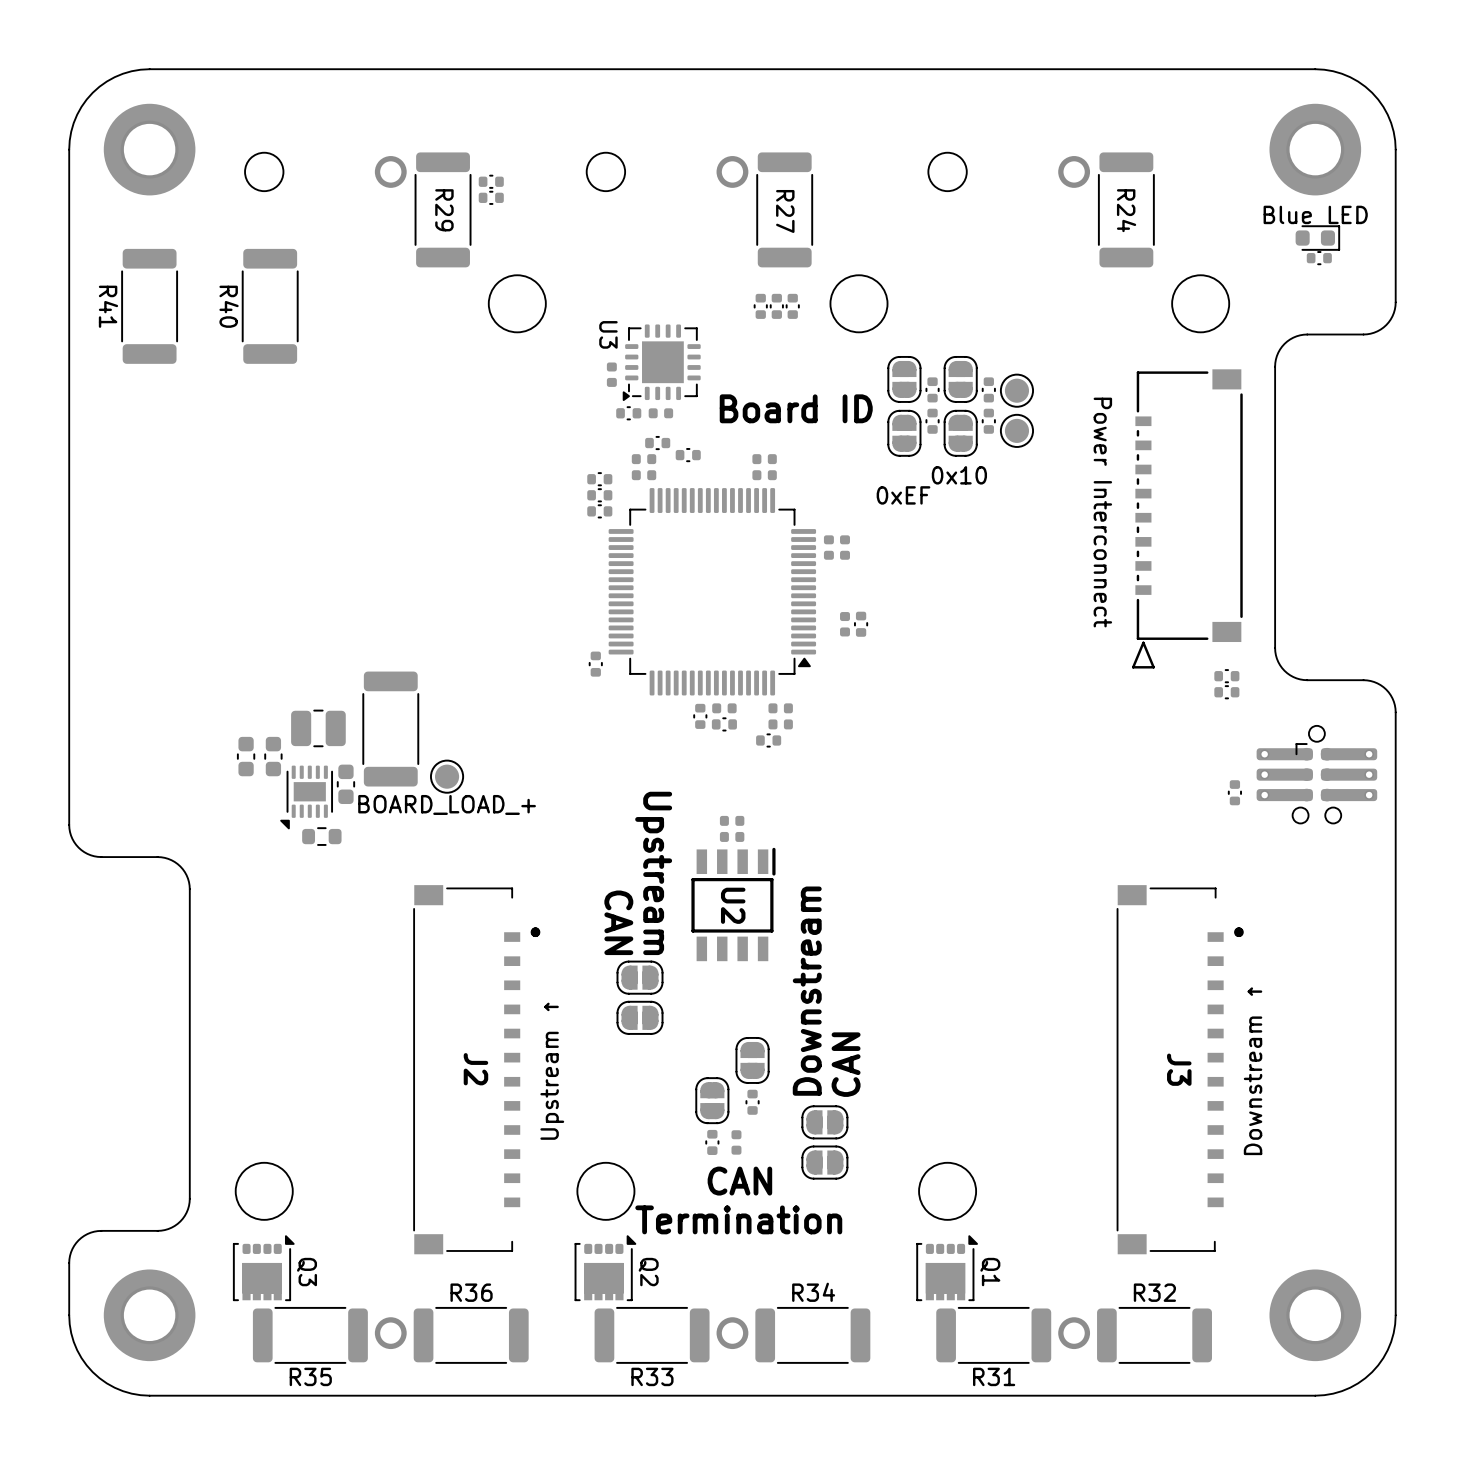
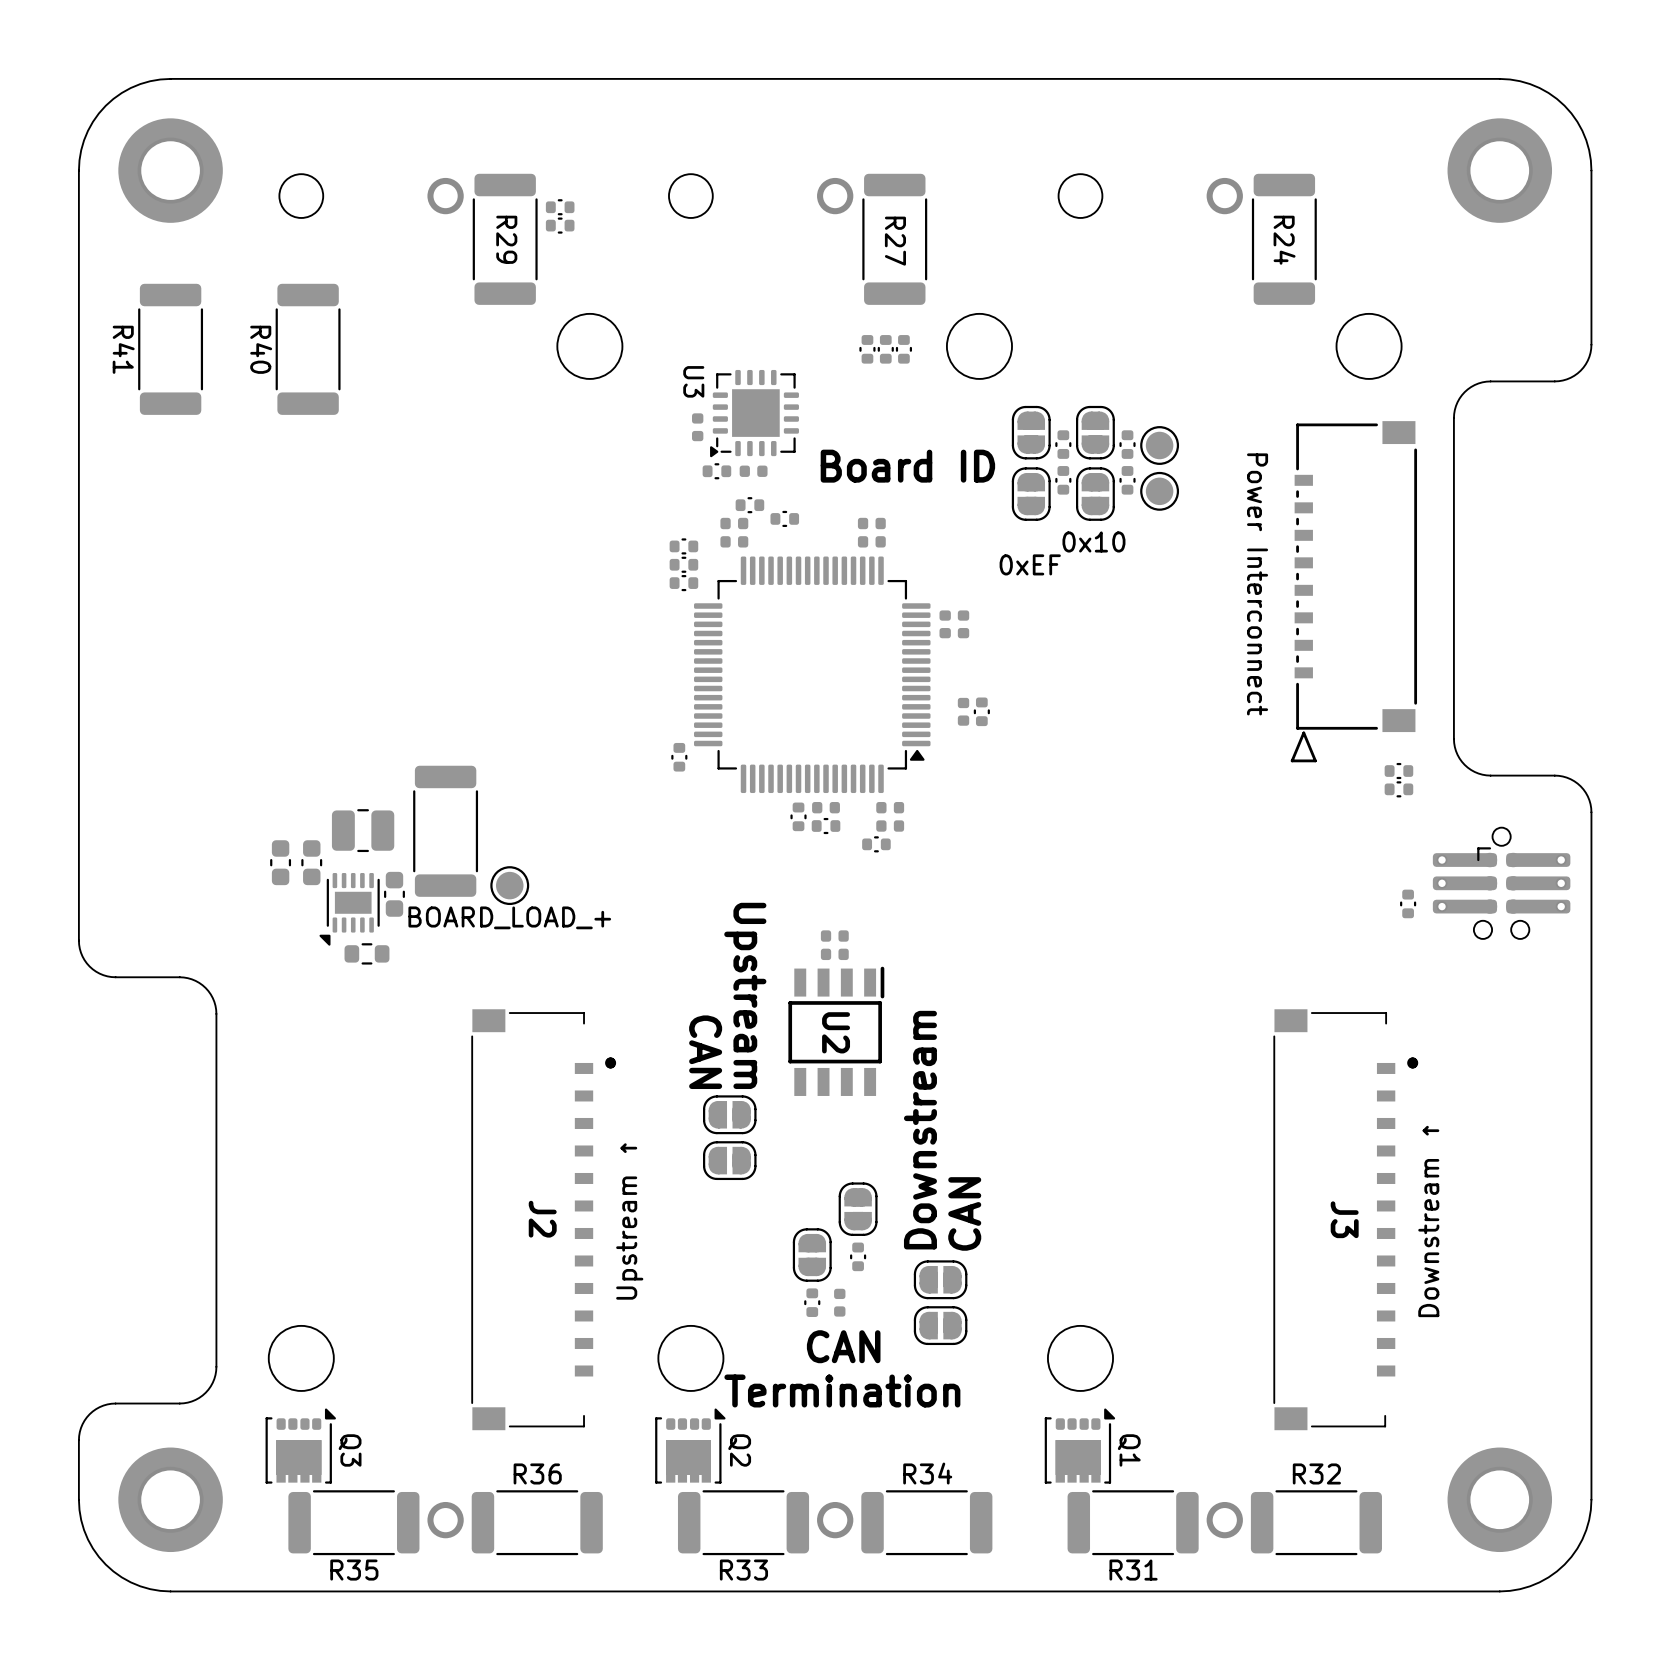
part: Blue LED (1317, 238) -> none
part: (1319, 258) -> none

